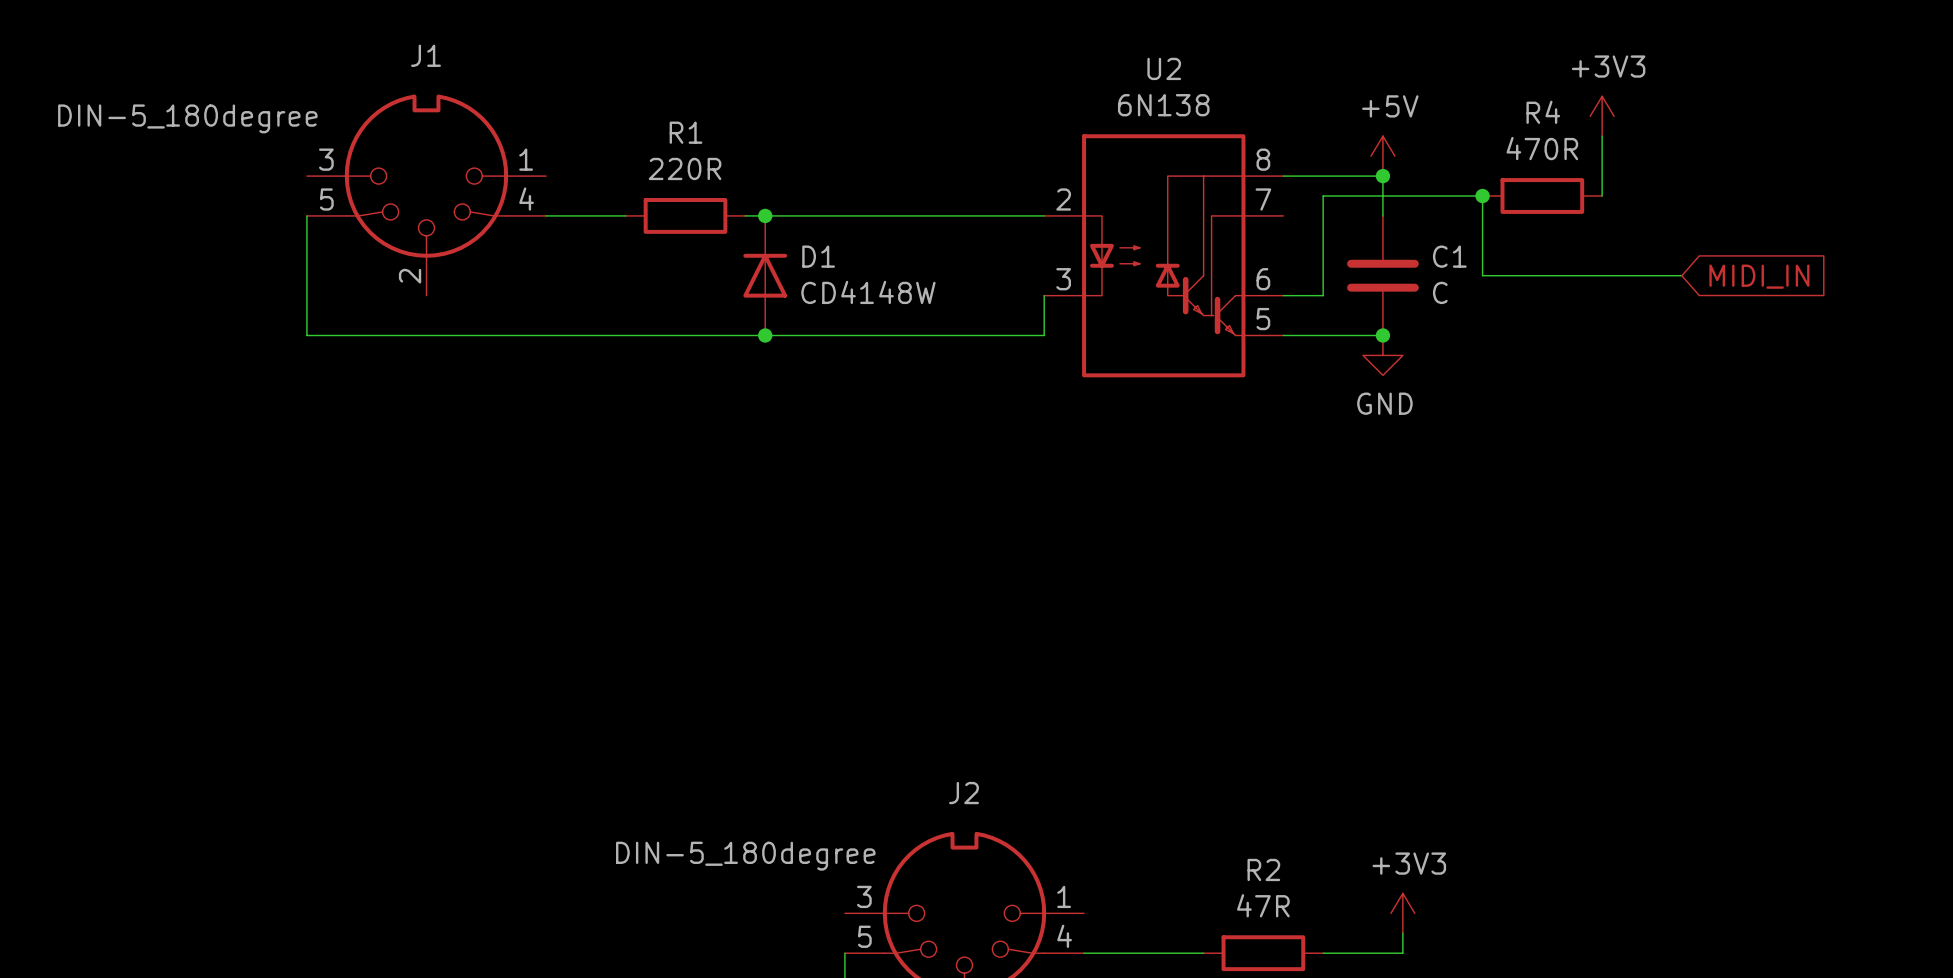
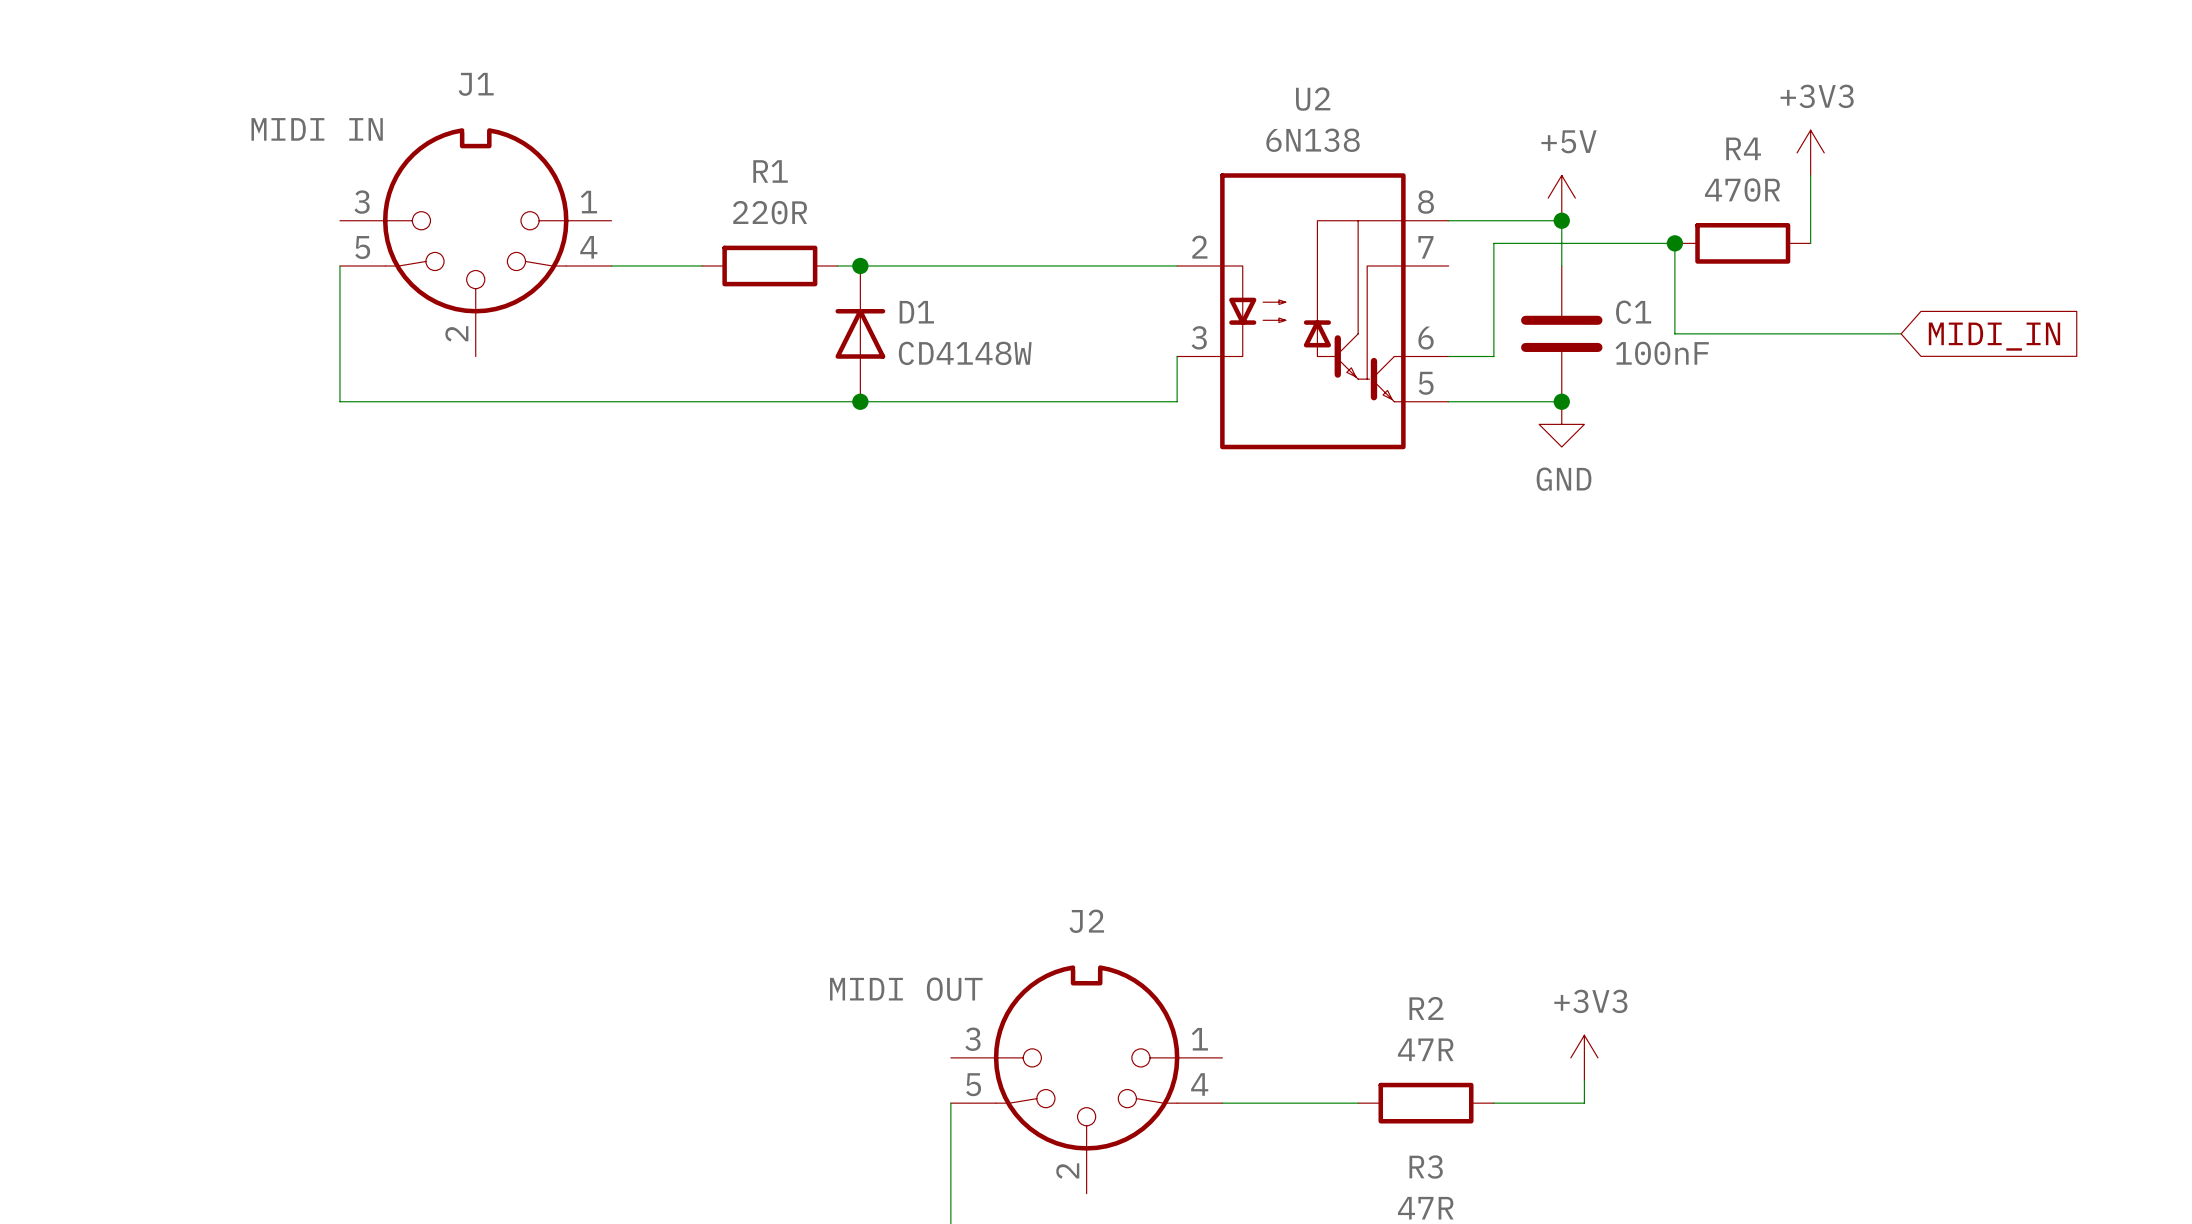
J1 value: DIN-5_180degree (187, 118) -> MIDI IN (317, 129)
C1 value: C (1440, 292) -> 100nF (1662, 353)
J2 value: DIN-5_180degree (745, 856) -> MIDI OUT (906, 989)

